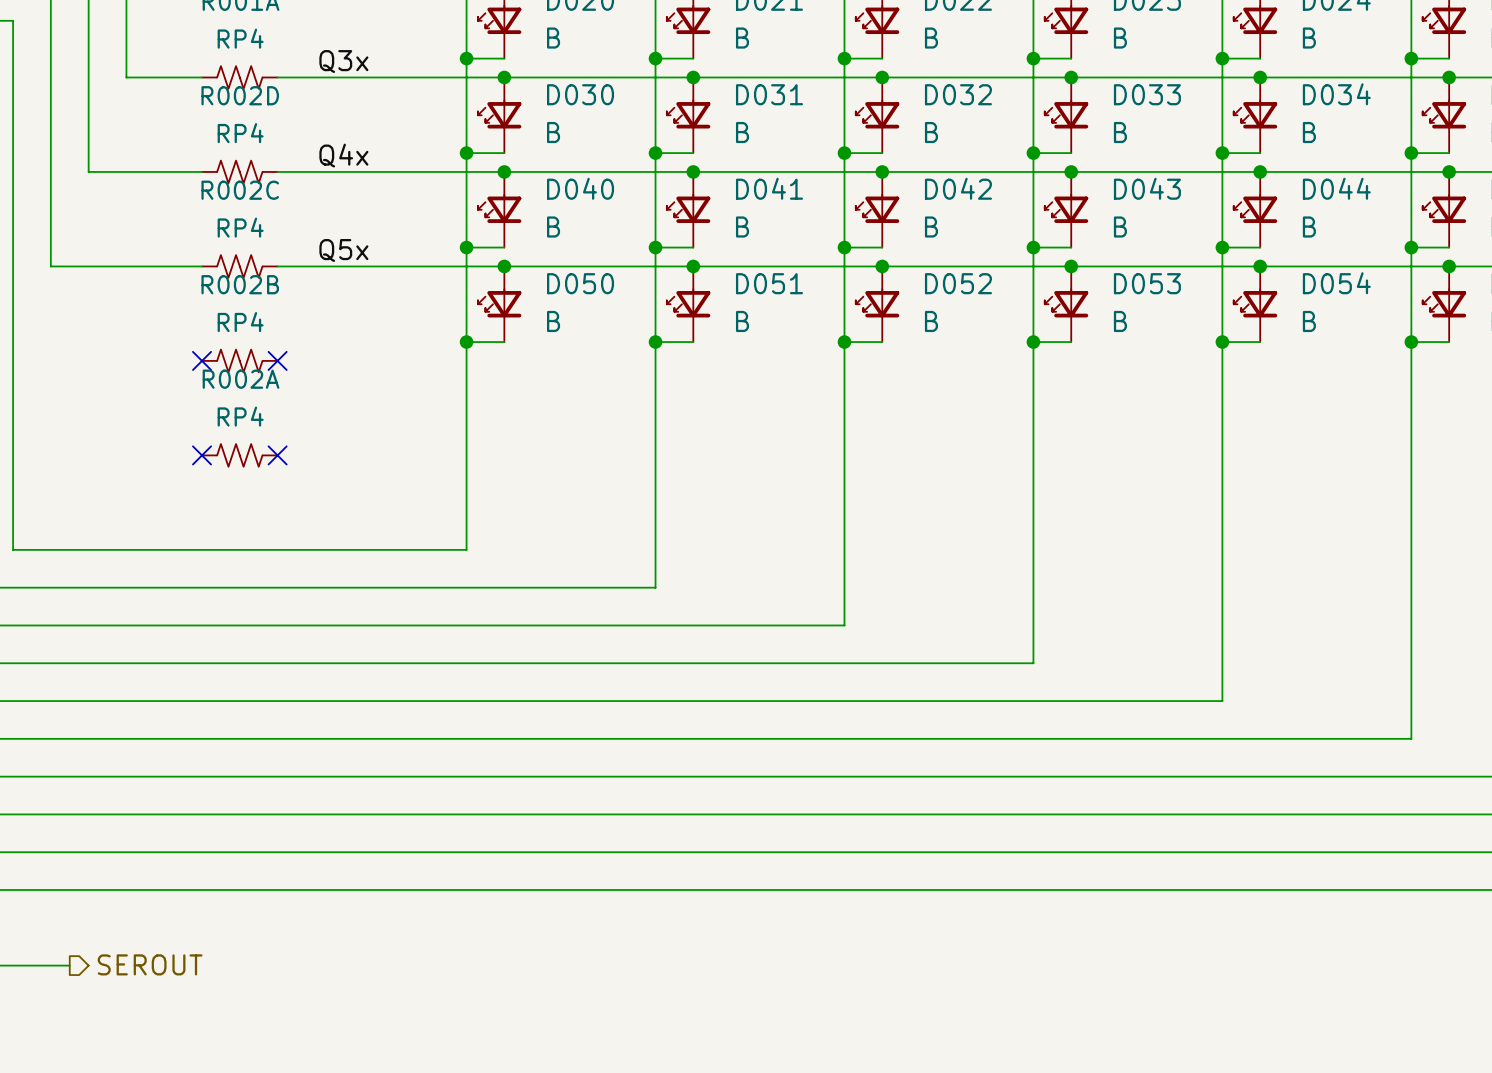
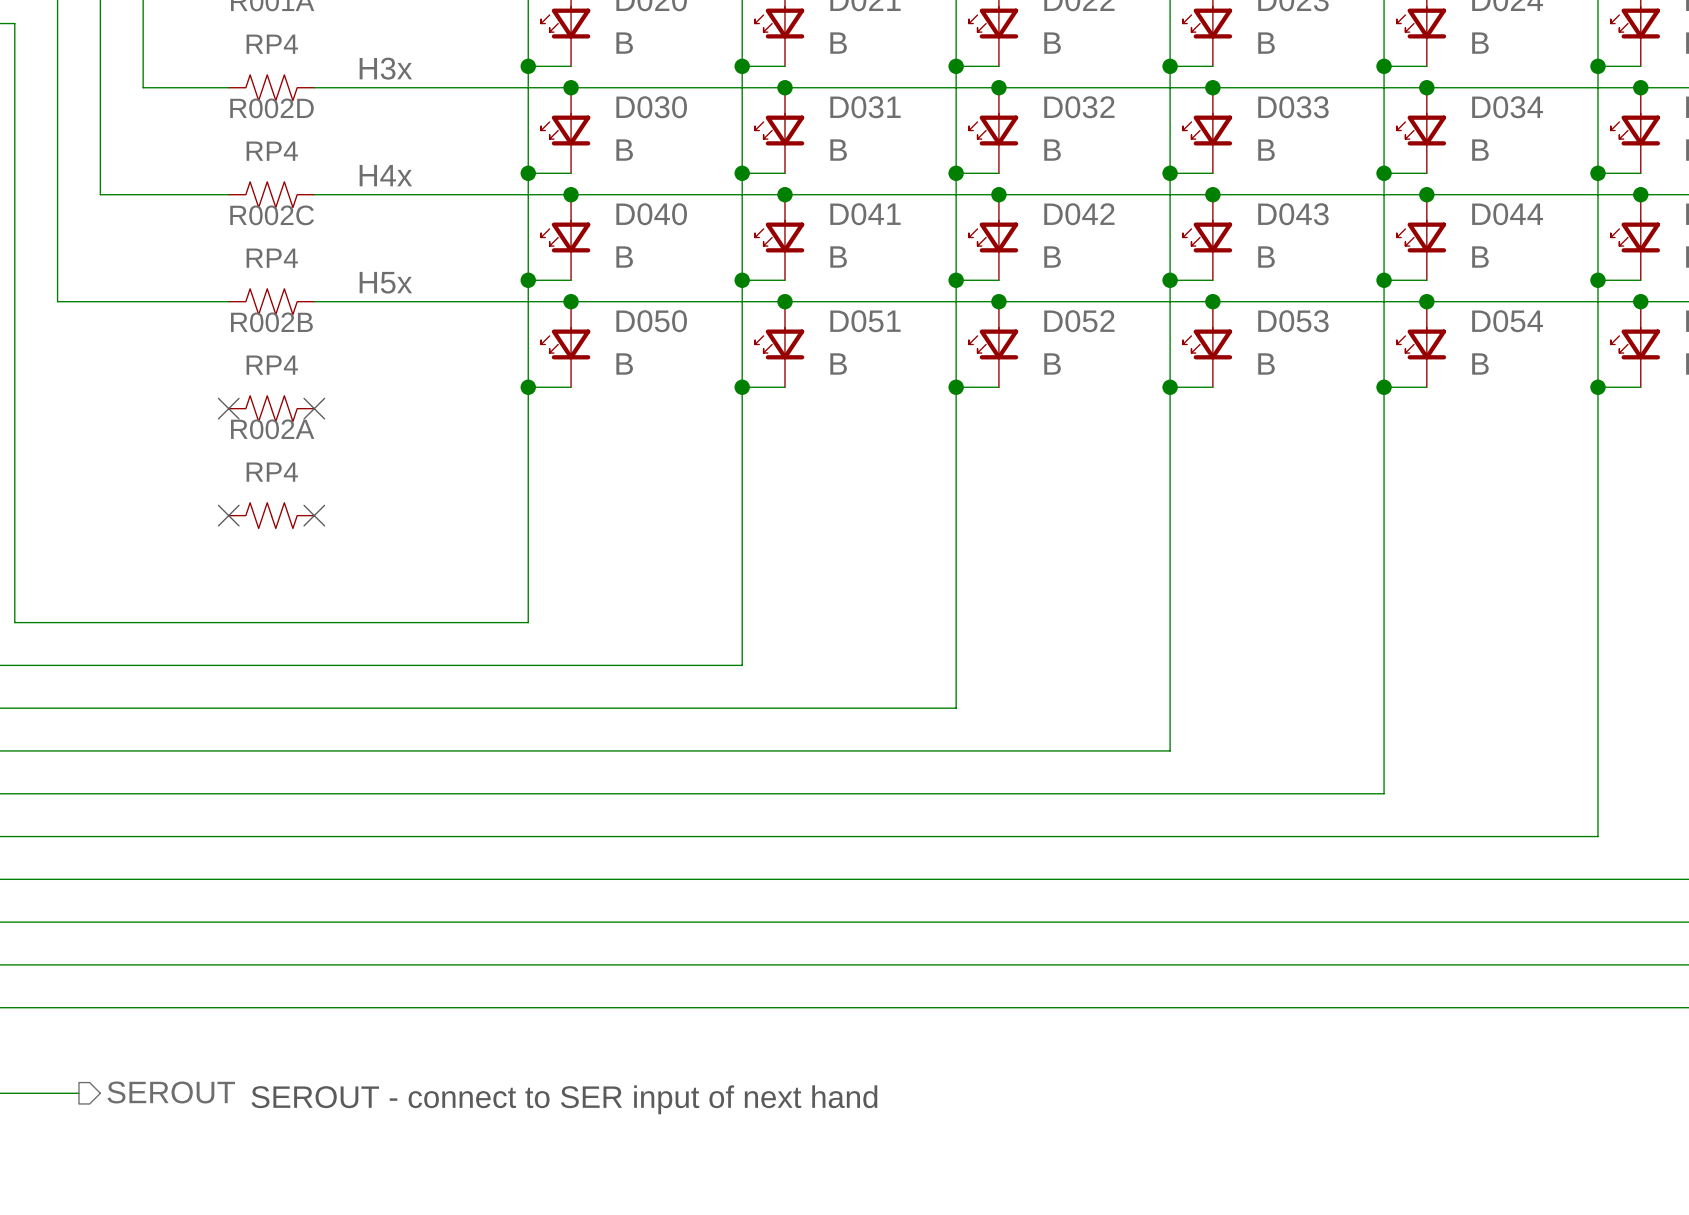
label: Q3x (343, 61) -> H3x (385, 68)
label: Q4x (343, 155) -> H4x (385, 175)
label: Q5x (343, 250) -> H5x (385, 282)
text: none -> SEROUT - connect to SER input of next hand (564, 1099)

